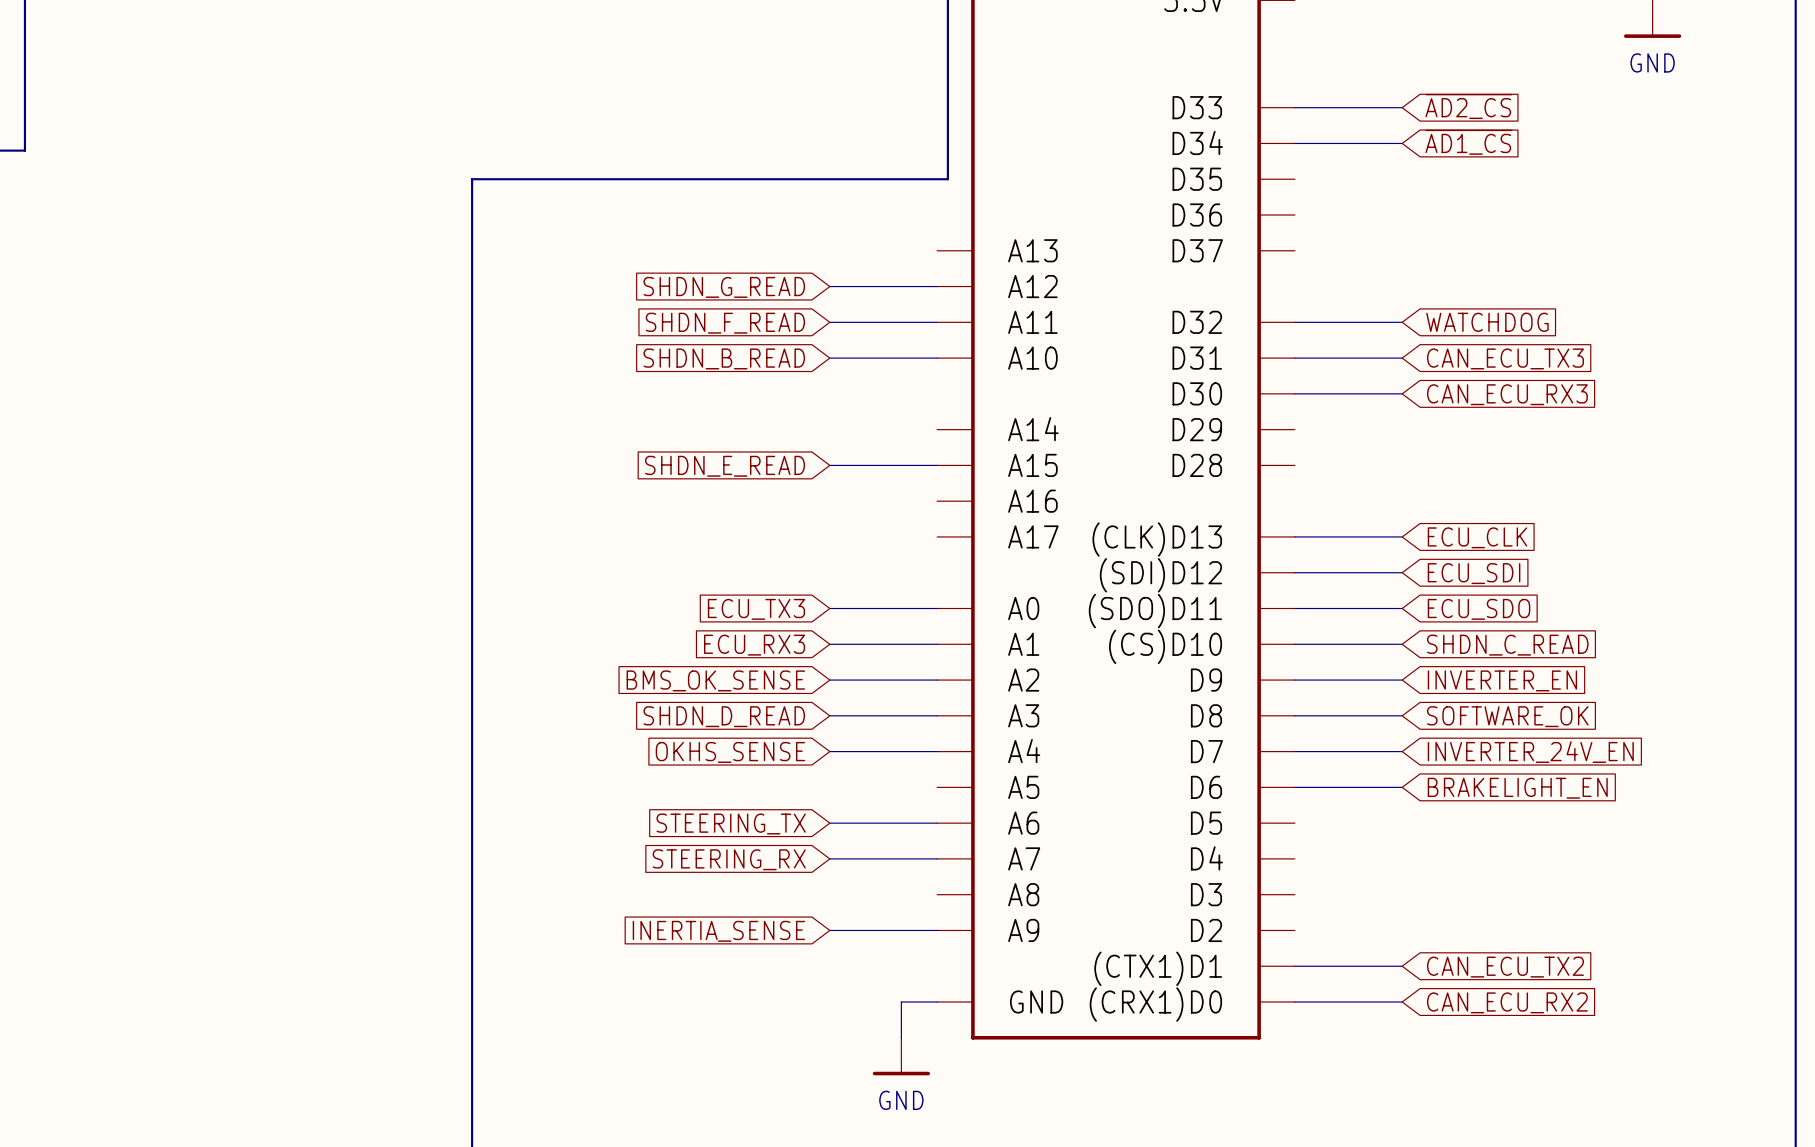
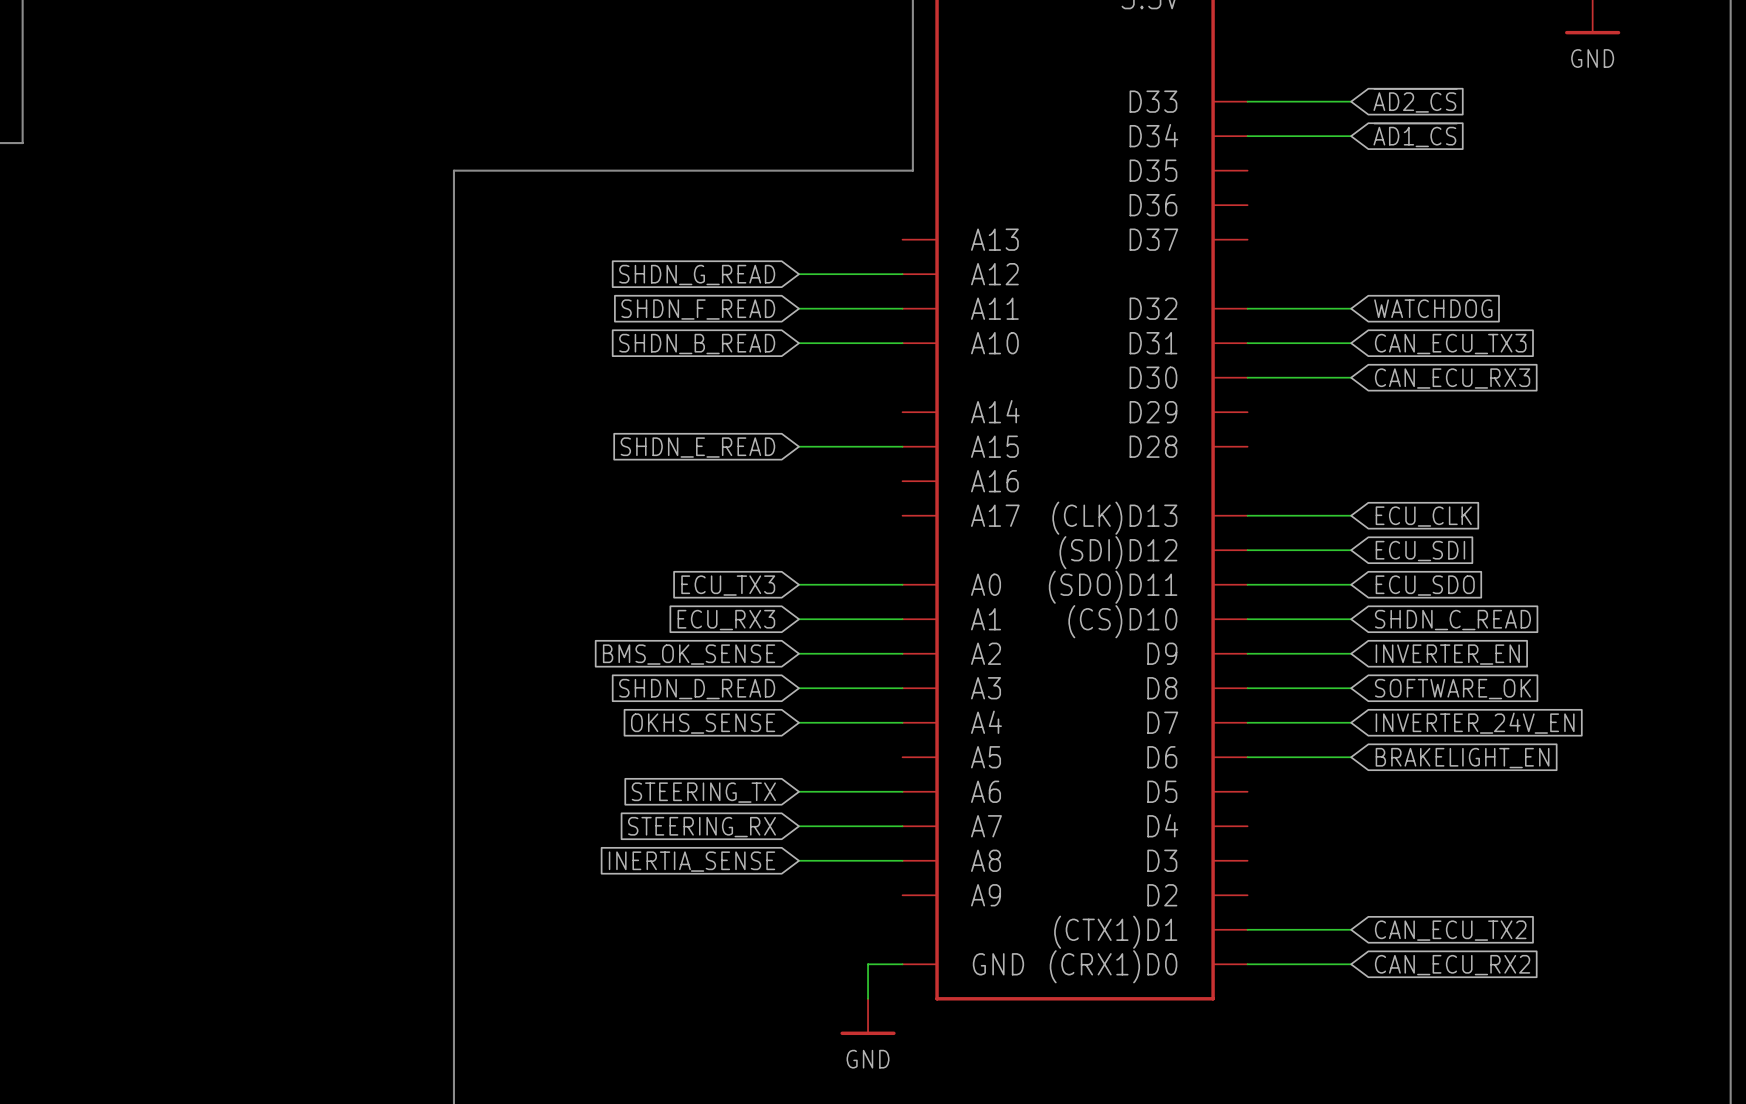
wire: (829, 930) (937, 930) -> (799, 860) (902, 860)
global label position: INERTIA_SENSE (718, 931) -> INERTIA_SENSE (692, 861)

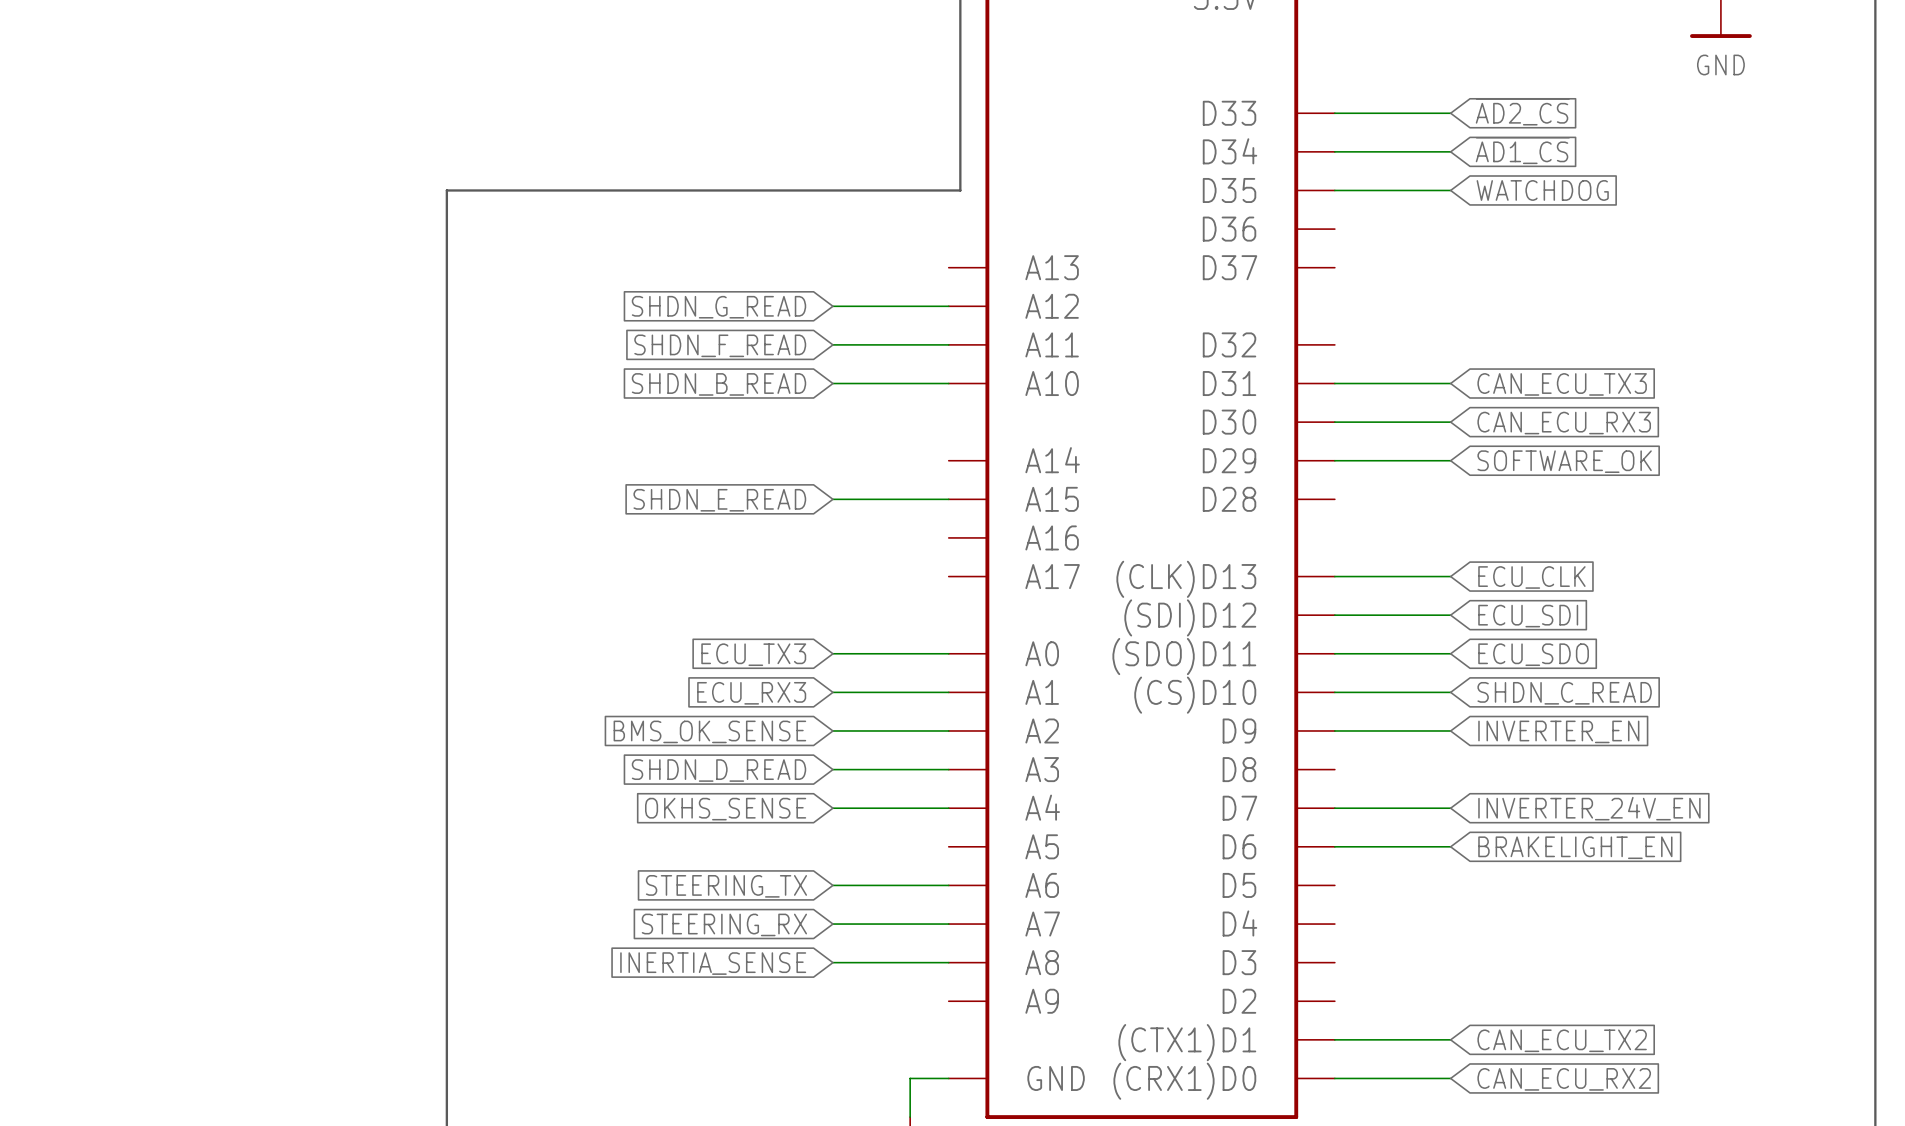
wire: none -> (1334, 190) (1450, 190)
wire: (1247, 308) (1351, 308) -> (1334, 460) (1450, 460)
global label position: WATCHDOG (1433, 308) -> WATCHDOG (1542, 190)
wire: (1247, 688) (1351, 688) -> none
global label position: SOFTWARE_OK (1452, 689) -> SOFTWARE_OK (1564, 461)

